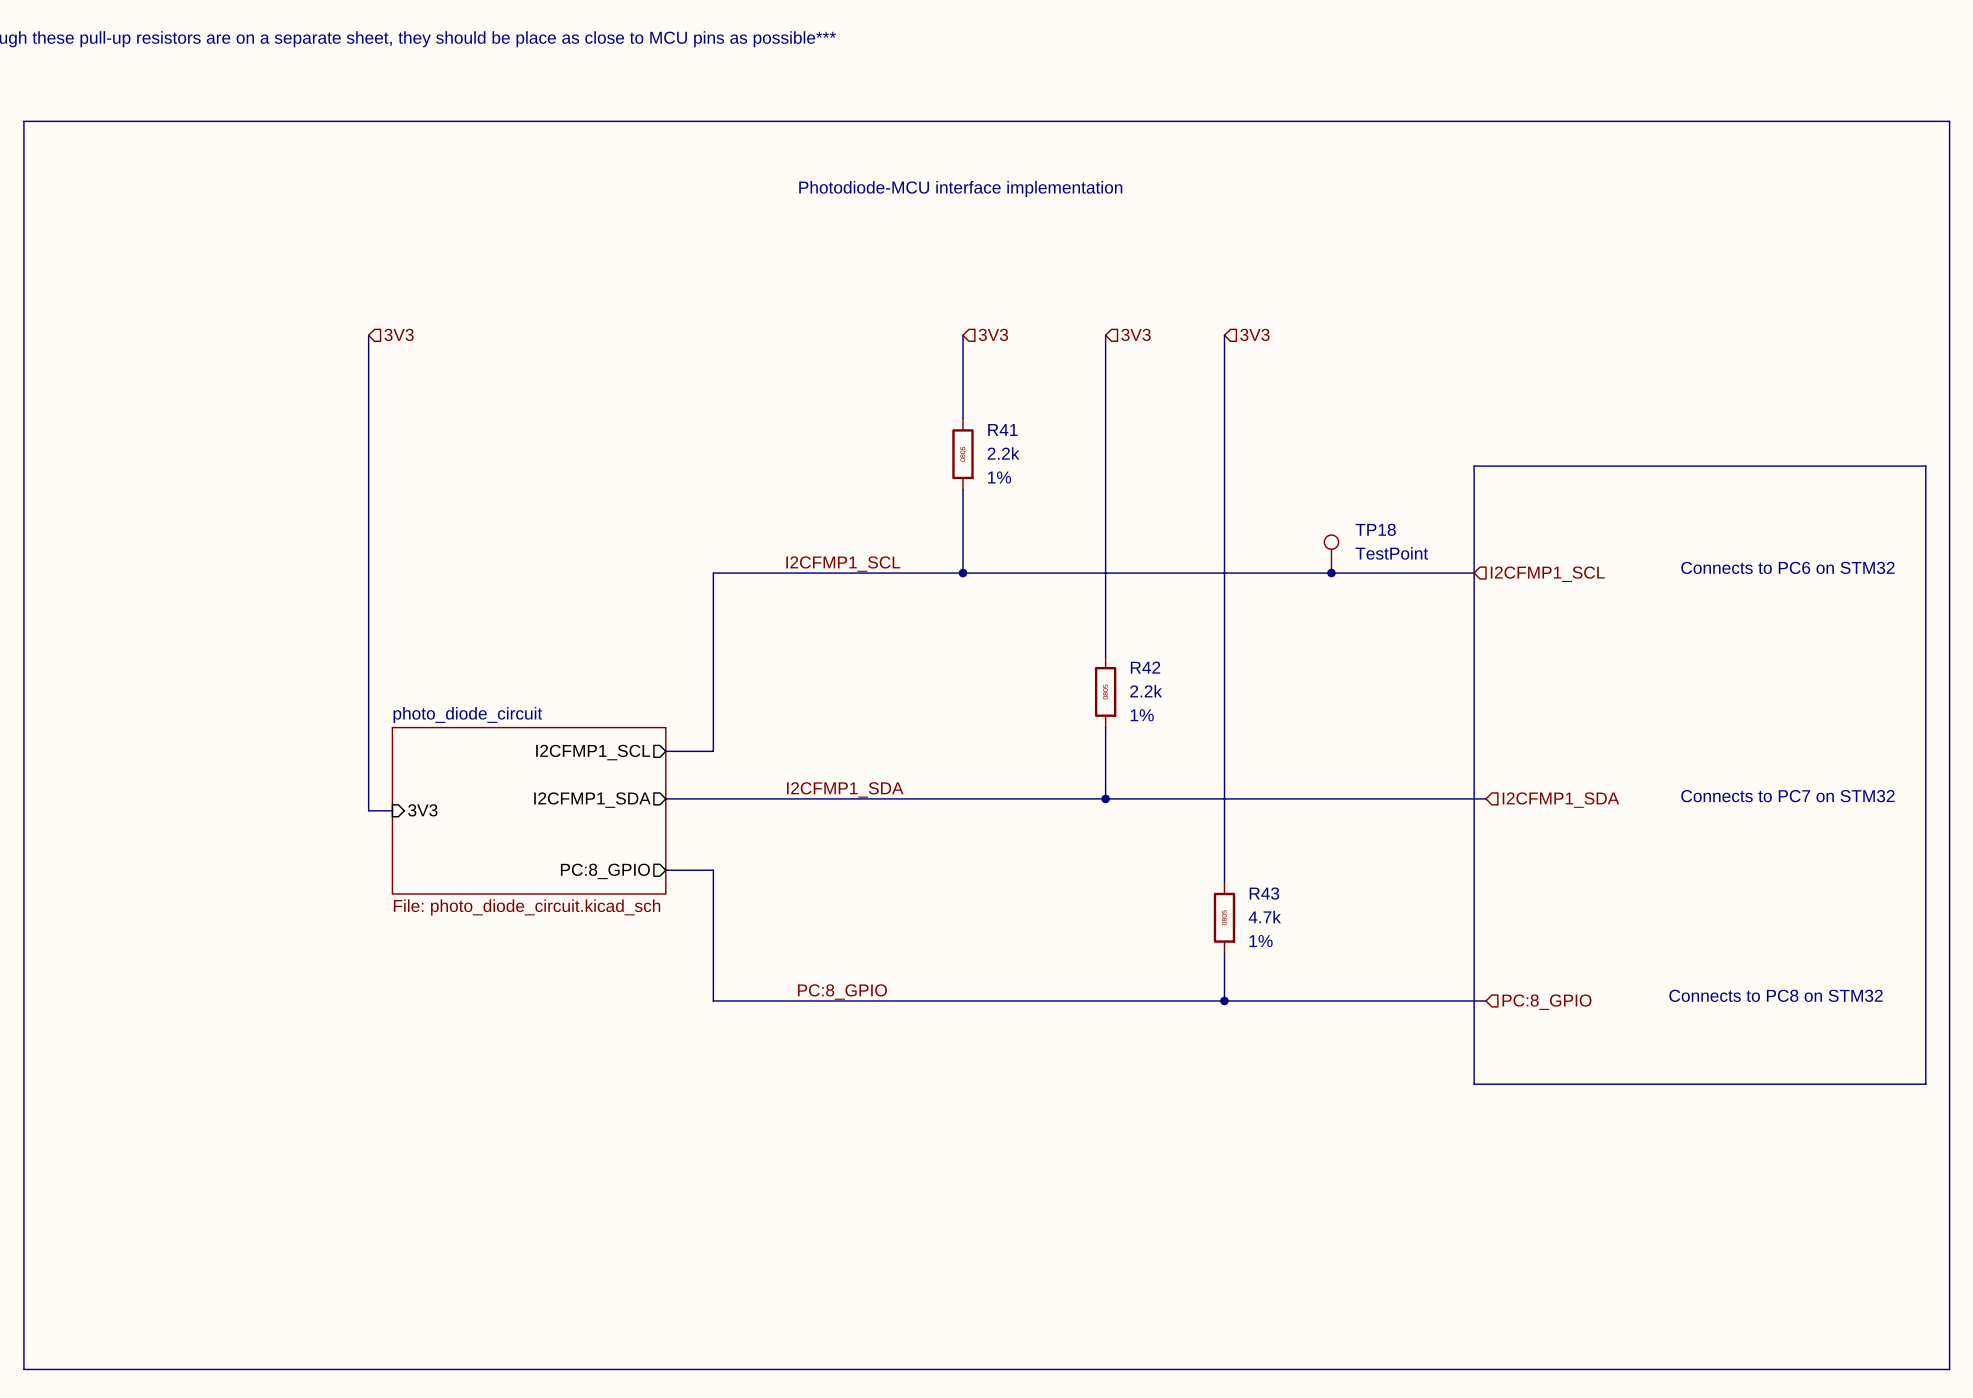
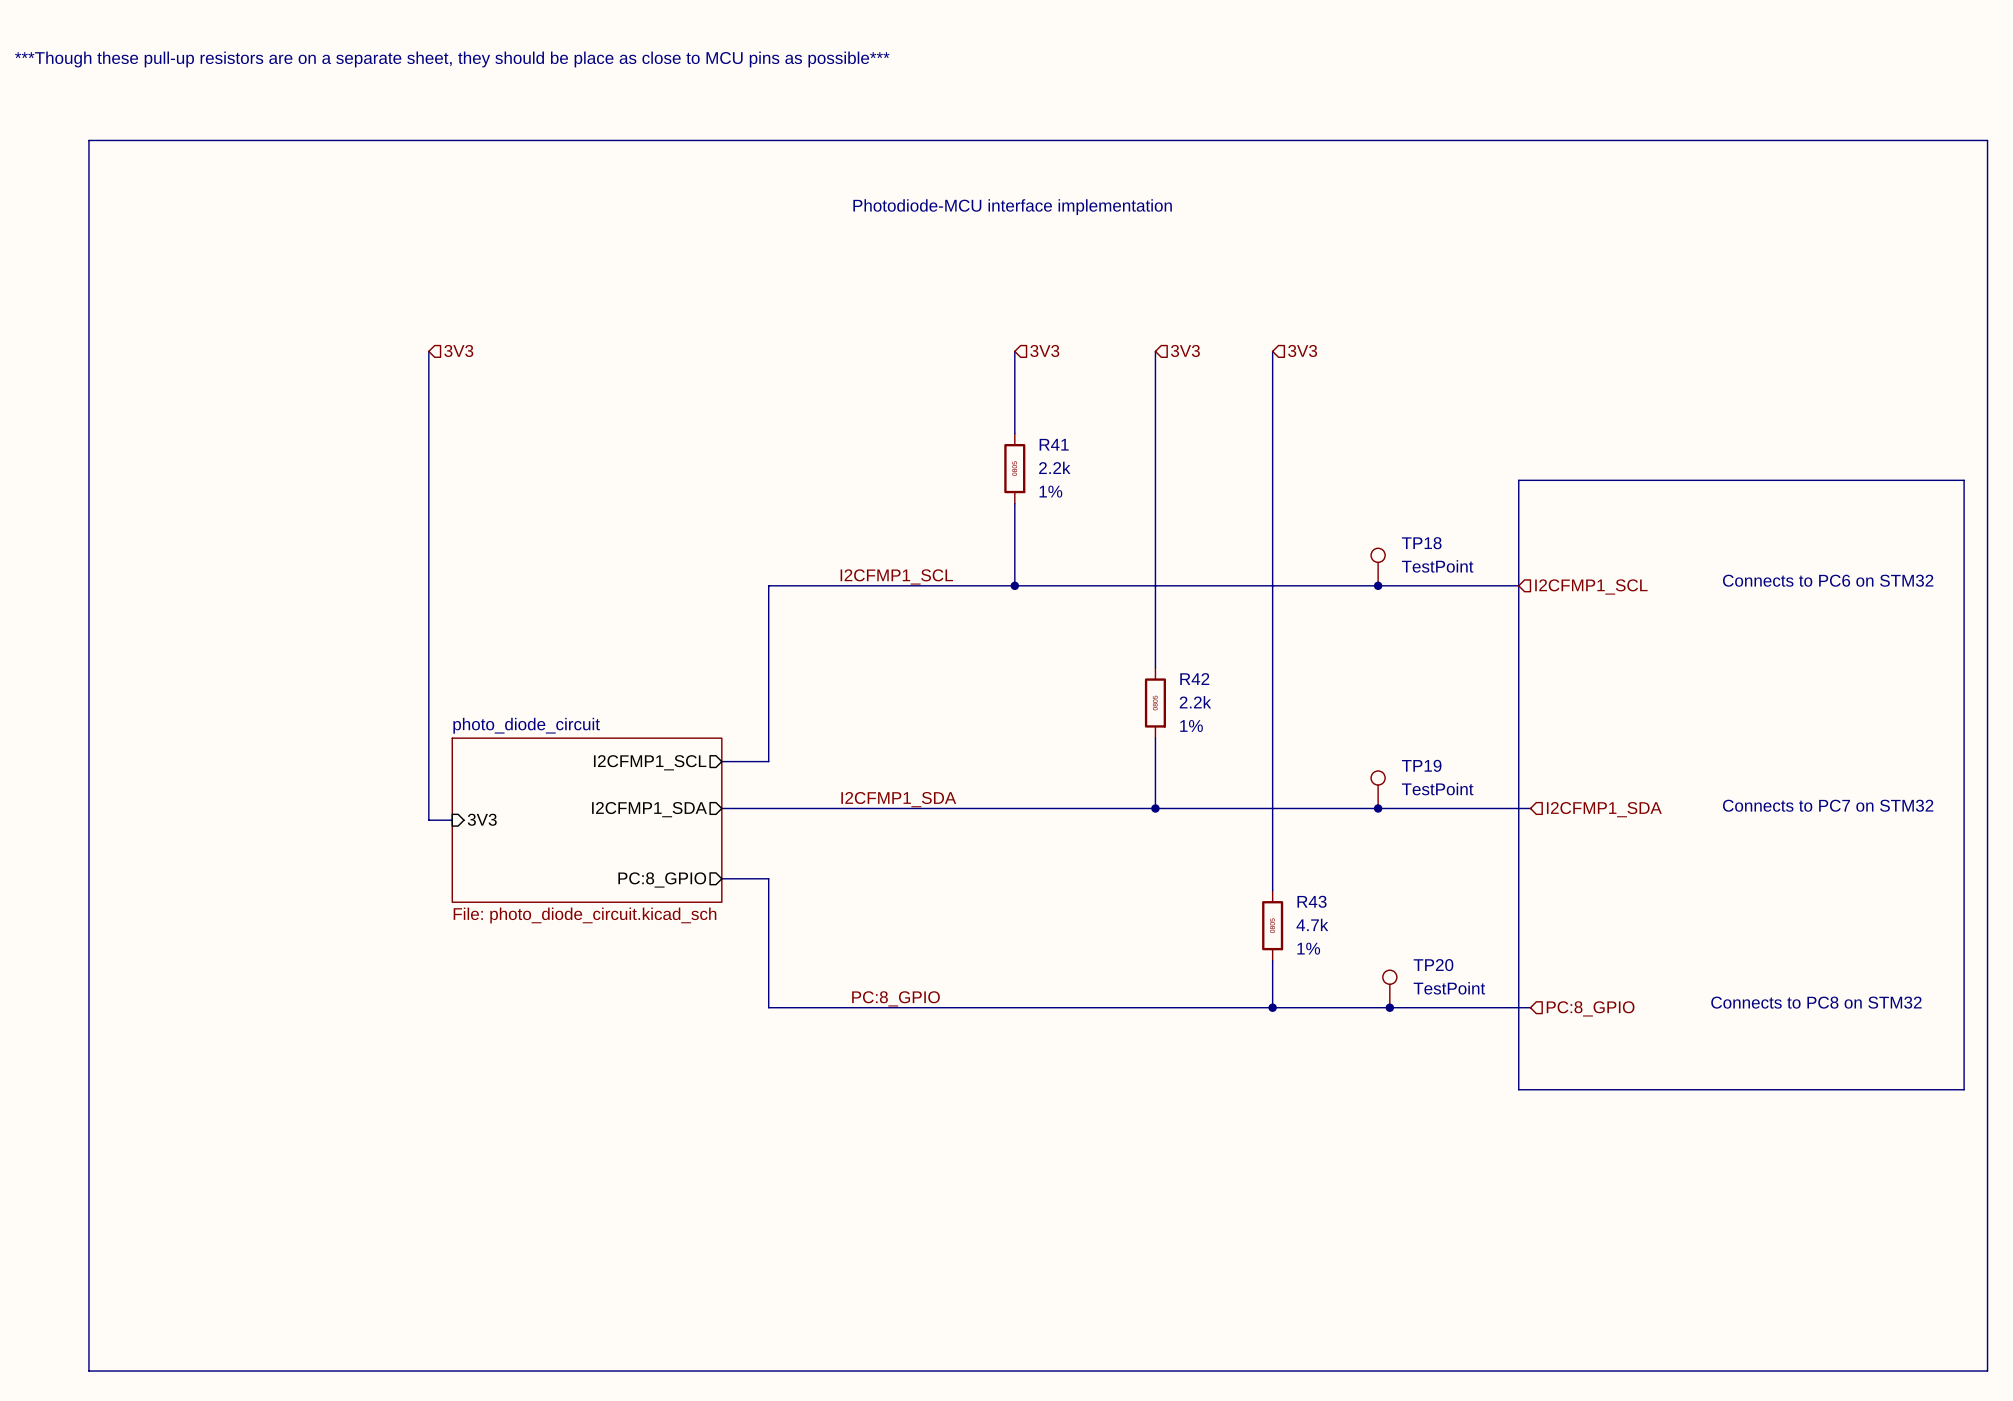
TP19: none -> TestPoint (1378, 789)
junction: none -> (1378, 808)
TP20: none -> TestPoint (1389, 988)
junction: none -> (1389, 1007)

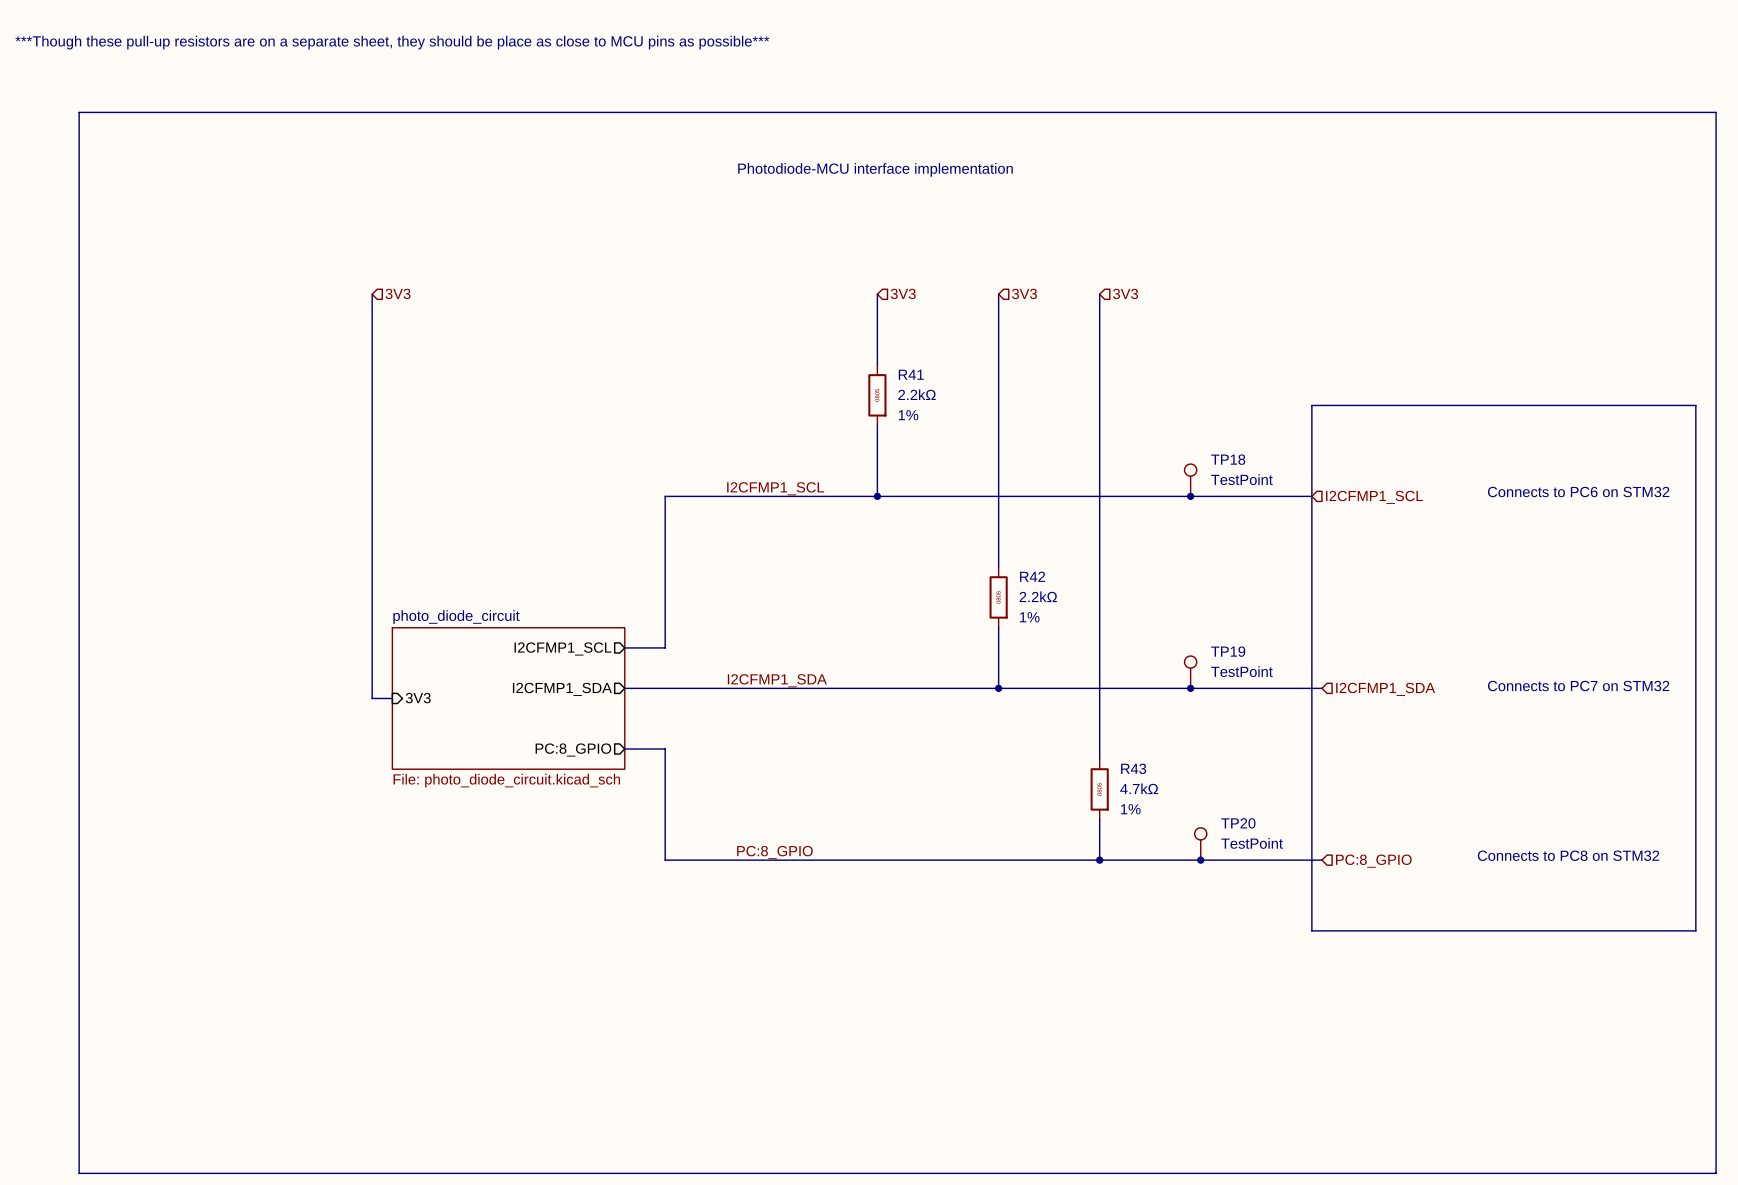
R41 value: 2.2k (1054, 467) -> 2.2kΩ (917, 394)
R42 value: 2.2k (1195, 702) -> 2.2kΩ (1038, 596)
R43 value: 4.7k (1312, 924) -> 4.7kΩ (1139, 788)

